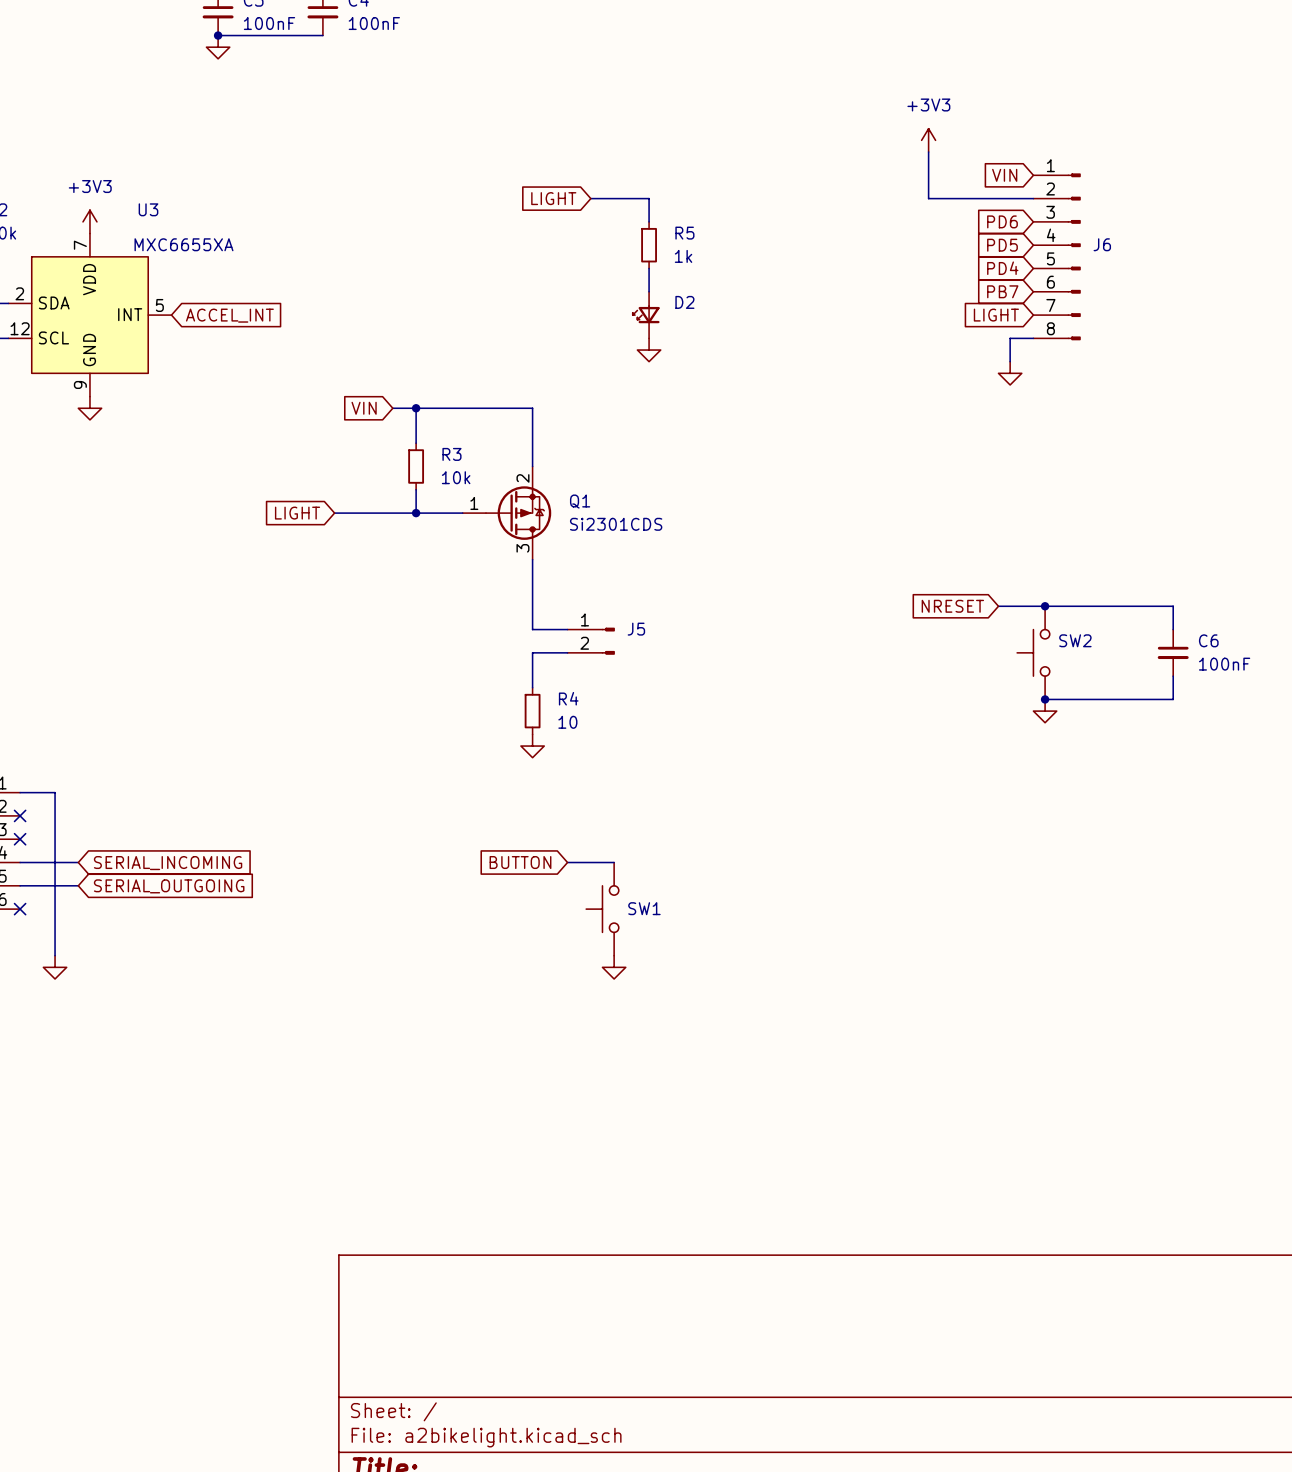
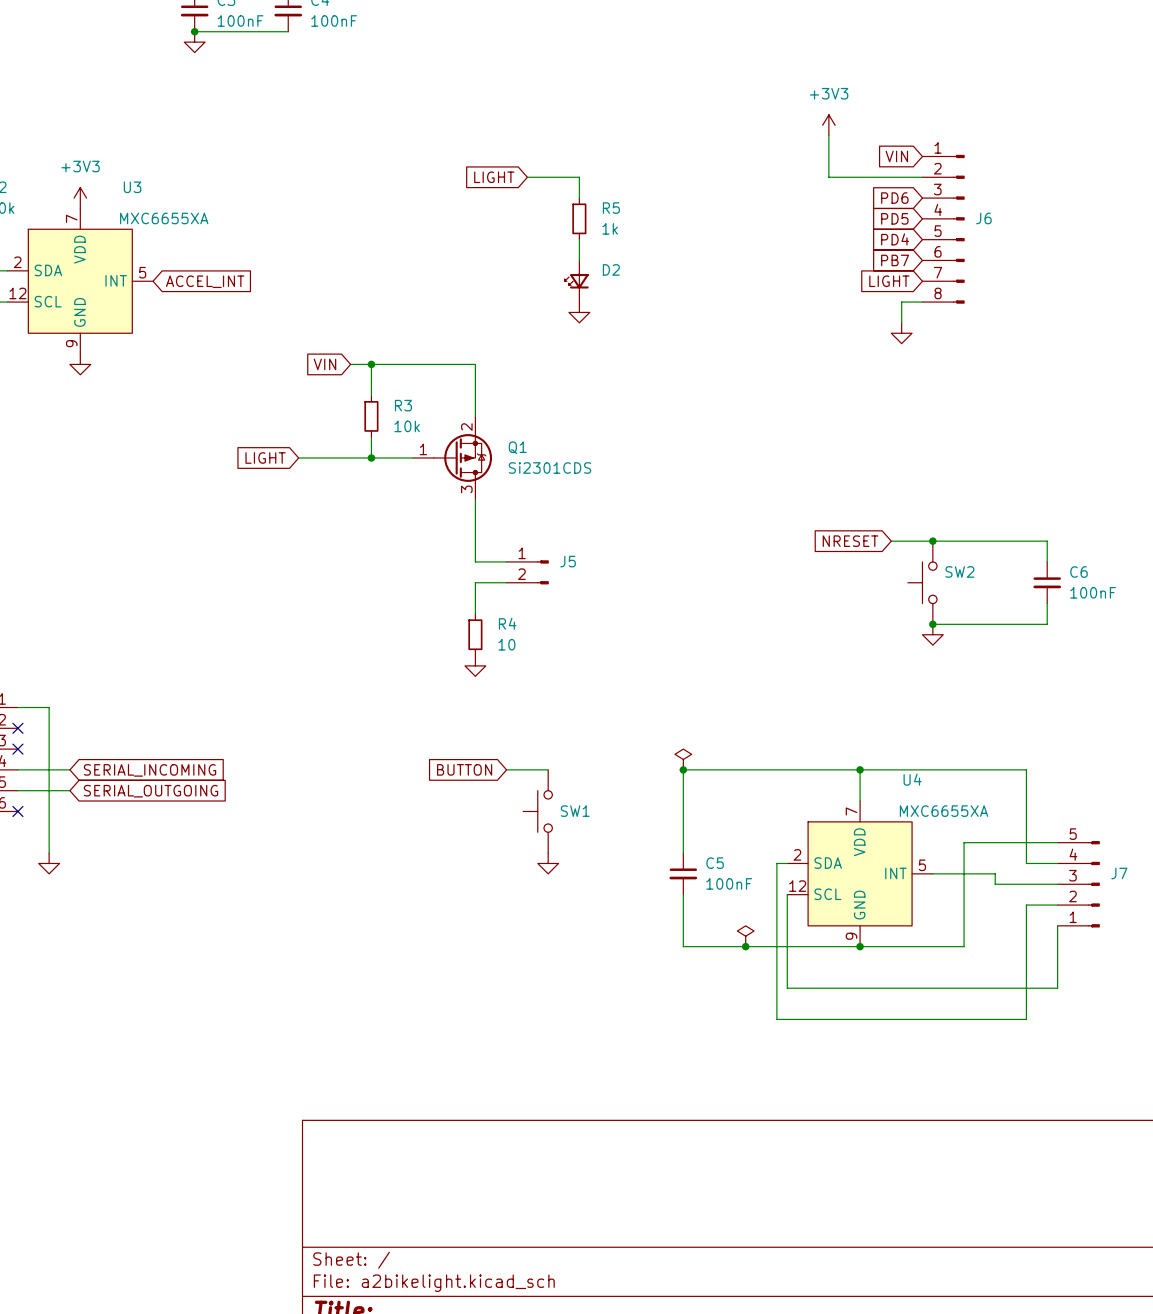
power symbol: none -> (683, 759)
junction: none -> (683, 769)
wire: none -> (860, 769) (860, 801)
junction: none -> (860, 769)
wire: none -> (1057, 842) (964, 842) (964, 946) (683, 946) (683, 894)
wire: none -> (683, 853) (683, 769) (1026, 769) (1026, 863) (1057, 863)
wire: none -> (787, 863) (776, 863) (776, 1019) (1026, 1019) (1026, 905) (1057, 905)
C5: none -> 100nF (683, 873)
U4: none -> MXC6655XA (860, 873)
wire: none -> (932, 873) (995, 873) (995, 884) (1057, 884)
J7: none -> (1078, 884)
wire: none -> (787, 894) (787, 988) (1057, 988) (1057, 925)
power symbol: none -> (745, 936)
junction: none -> (745, 946)
junction: none -> (860, 946)

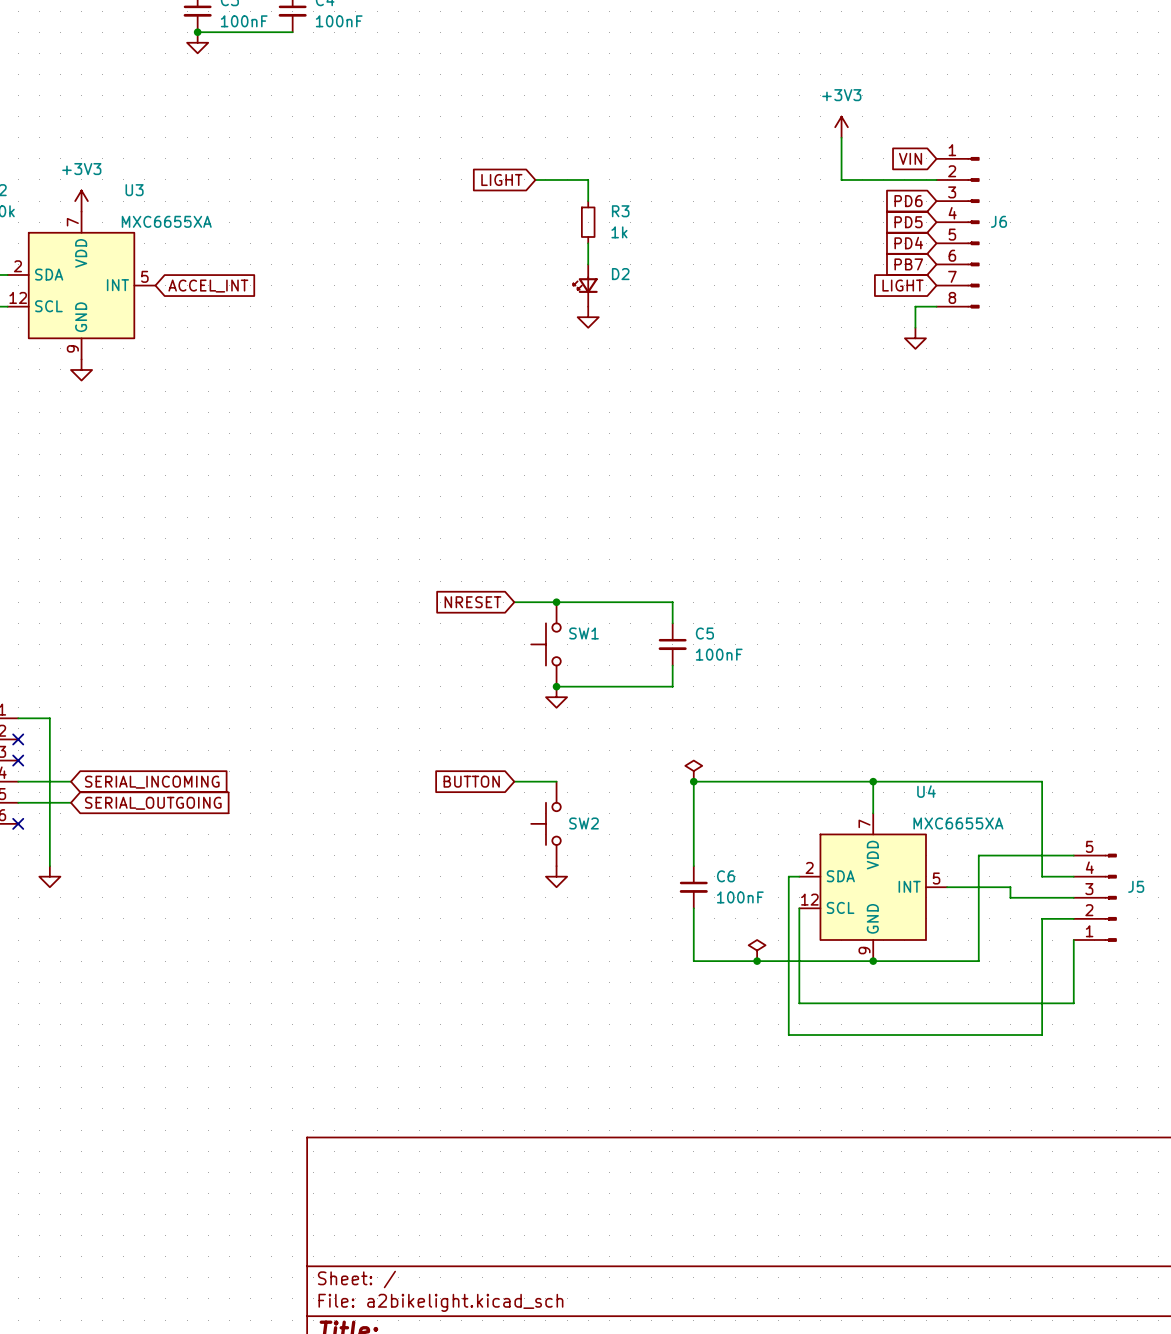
R5 name: R5 (611, 208) -> R3 (620, 211)
global label: VIN (324, 364) -> none
wire: (350, 364) (475, 364) (475, 416) -> none
wire: (371, 364) (371, 395) -> none
junction: (371, 364) -> none
R3: 10k (371, 416) -> none
wire: (371, 437) (371, 457) -> none
global label: LIGHT (265, 457) -> none
wire: (298, 457) (413, 457) -> none
junction: (371, 457) -> none
Q1: Si2301CDS (452, 457) -> none
wire: (475, 499) (475, 561) (506, 561) -> none
global label: NRESET (850, 541) -> none
wire: (891, 541) (1047, 541) (1047, 561) -> none
junction: (932, 541) -> none
J5: (527, 572) -> none
wire: (506, 582) (475, 582) (475, 613) -> none
SW2: (922, 582) -> none
C6: 100nF (1047, 582) -> none
global label: none -> NRESET (472, 602)
wire: none -> (514, 602) (672, 602) (672, 623)
junction: none -> (556, 602)
wire: (1047, 603) (1047, 624) (932, 624) -> none
junction: (932, 624) -> none
R4: 10 (475, 634) -> none
SW1: none -> (545, 644)
C5: none -> 100nF (672, 644)
power symbol: (932, 634) -> none
wire: none -> (672, 665) (672, 686) (556, 686)
power symbol position: (475, 665) -> (556, 697)
junction: none -> (556, 686)
SW1 name: SW1 (575, 811) -> SW2 (584, 823)
C5 name: C5 (715, 863) -> C6 (726, 876)
J7 name: J7 (1119, 873) -> J5 (1136, 886)

